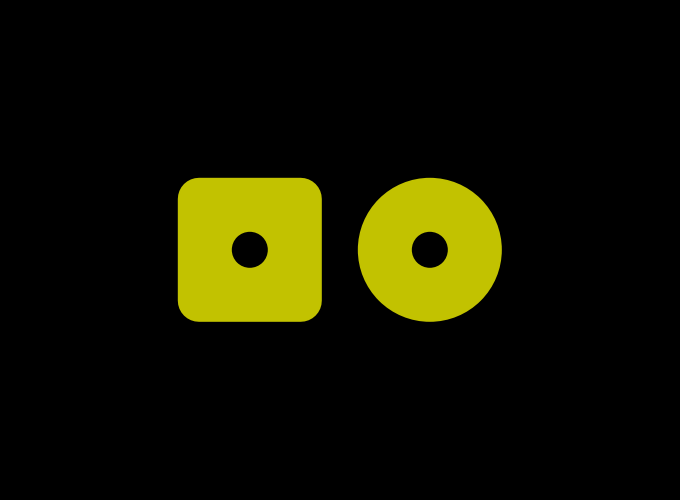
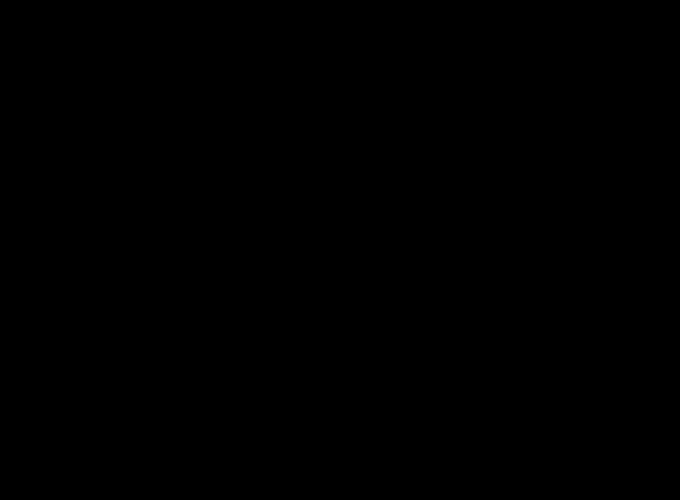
part: (339, 249) -> none

